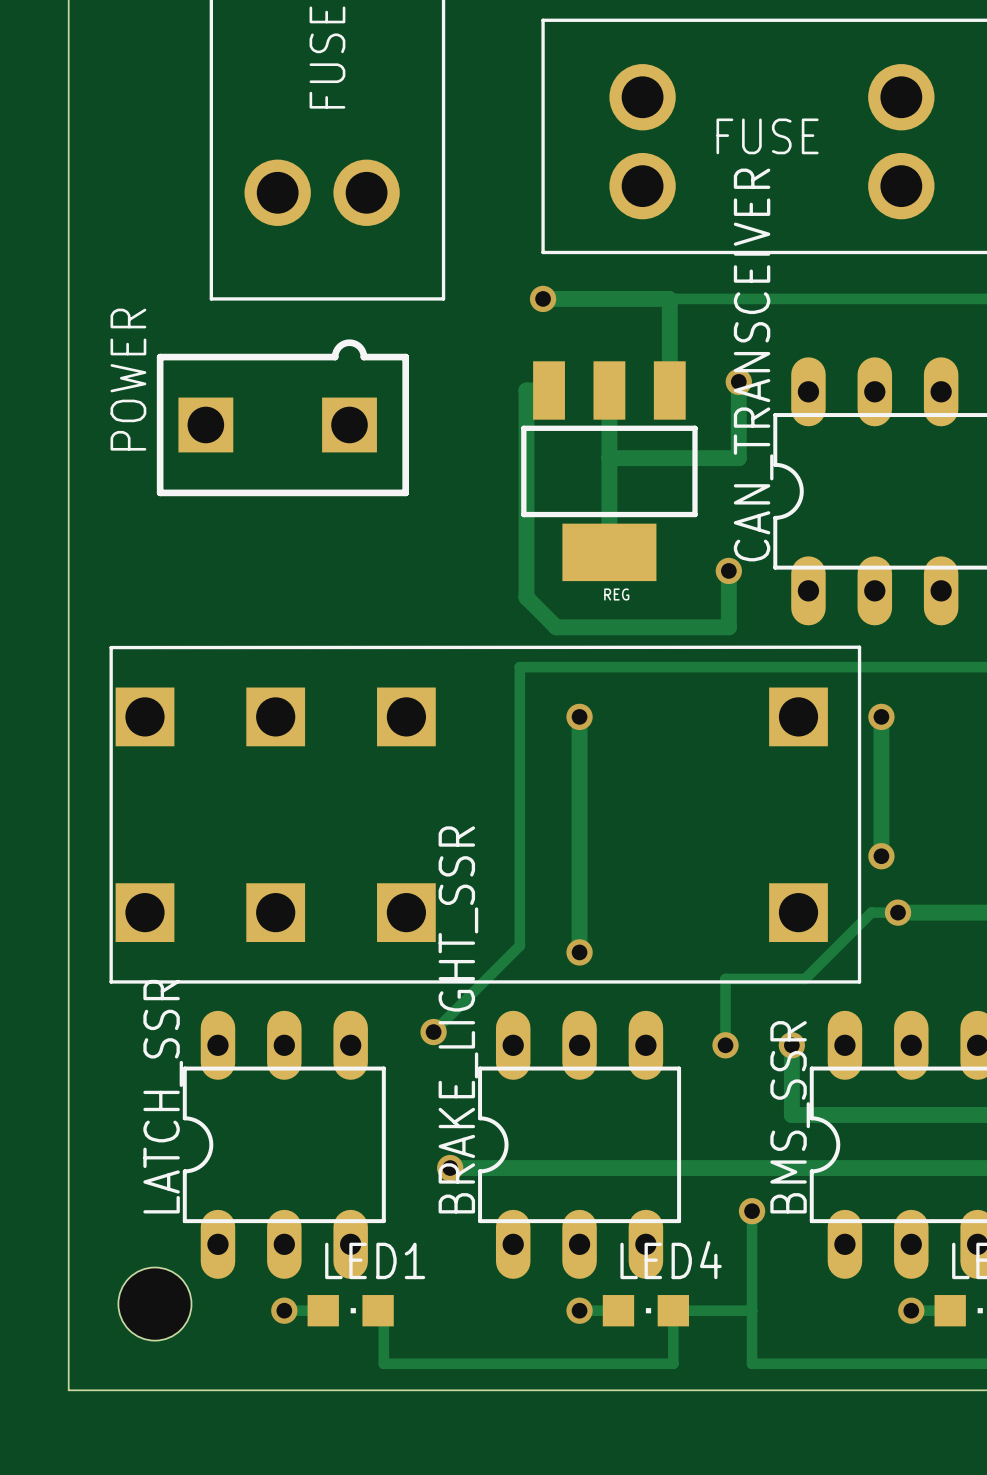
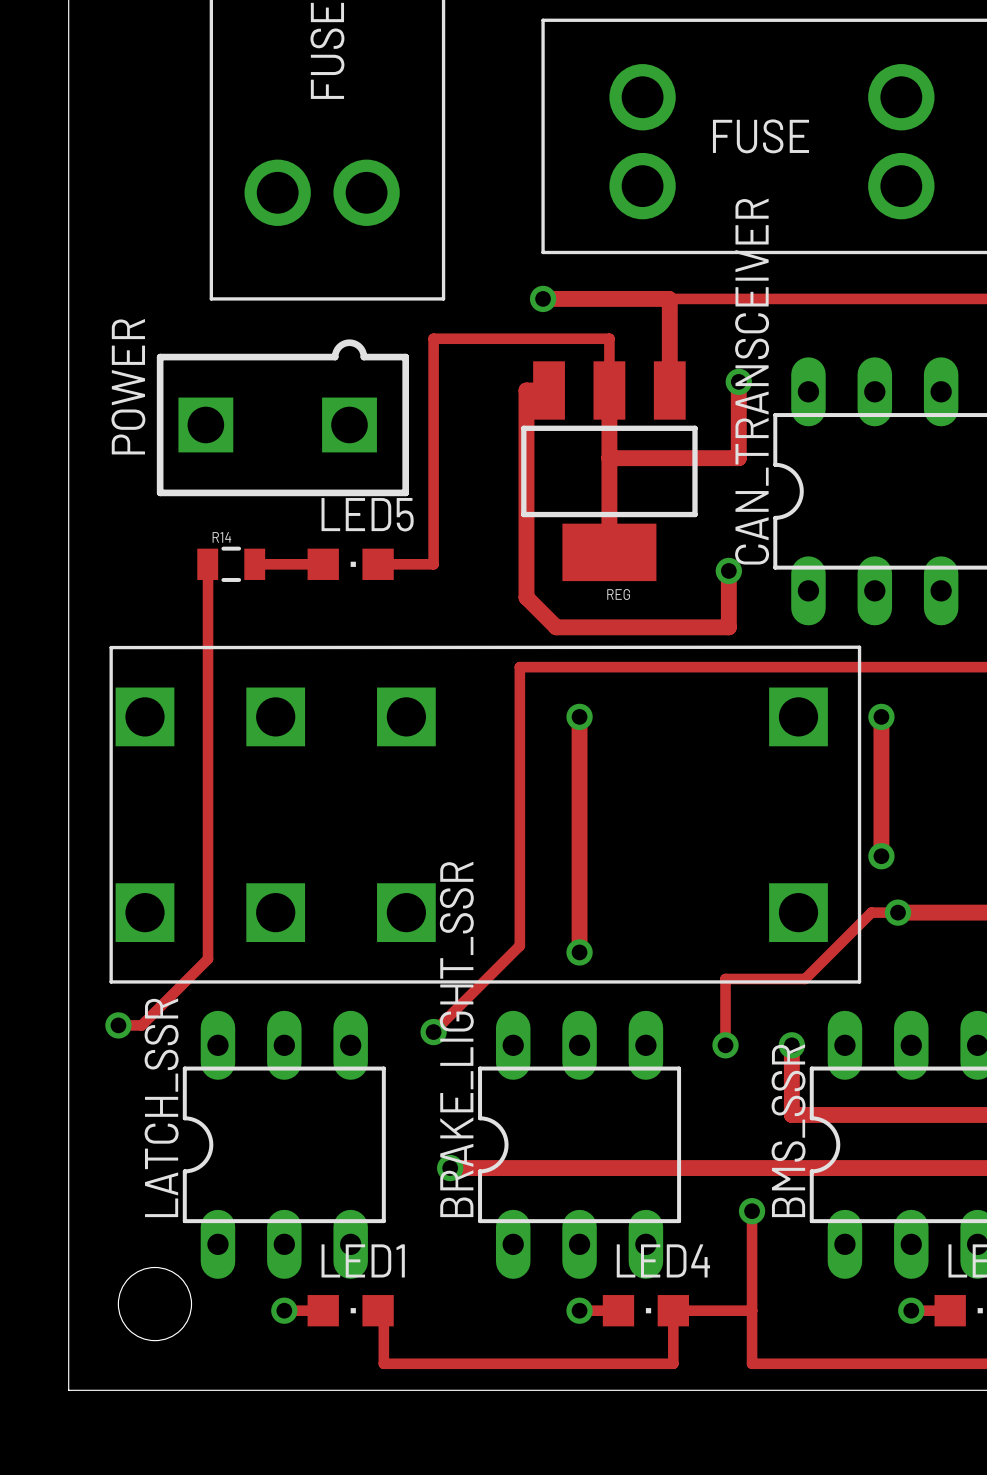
track: none -> (609, 390) (609, 338) (433, 338) (433, 564) (378, 564)
track: none -> (208, 564) (208, 959) (141, 1025) (118, 1025)
R14: none -> (231, 564)
track: none -> (254, 564) (323, 564)
LED5: none -> (350, 564)
via: none -> (118, 1025)

